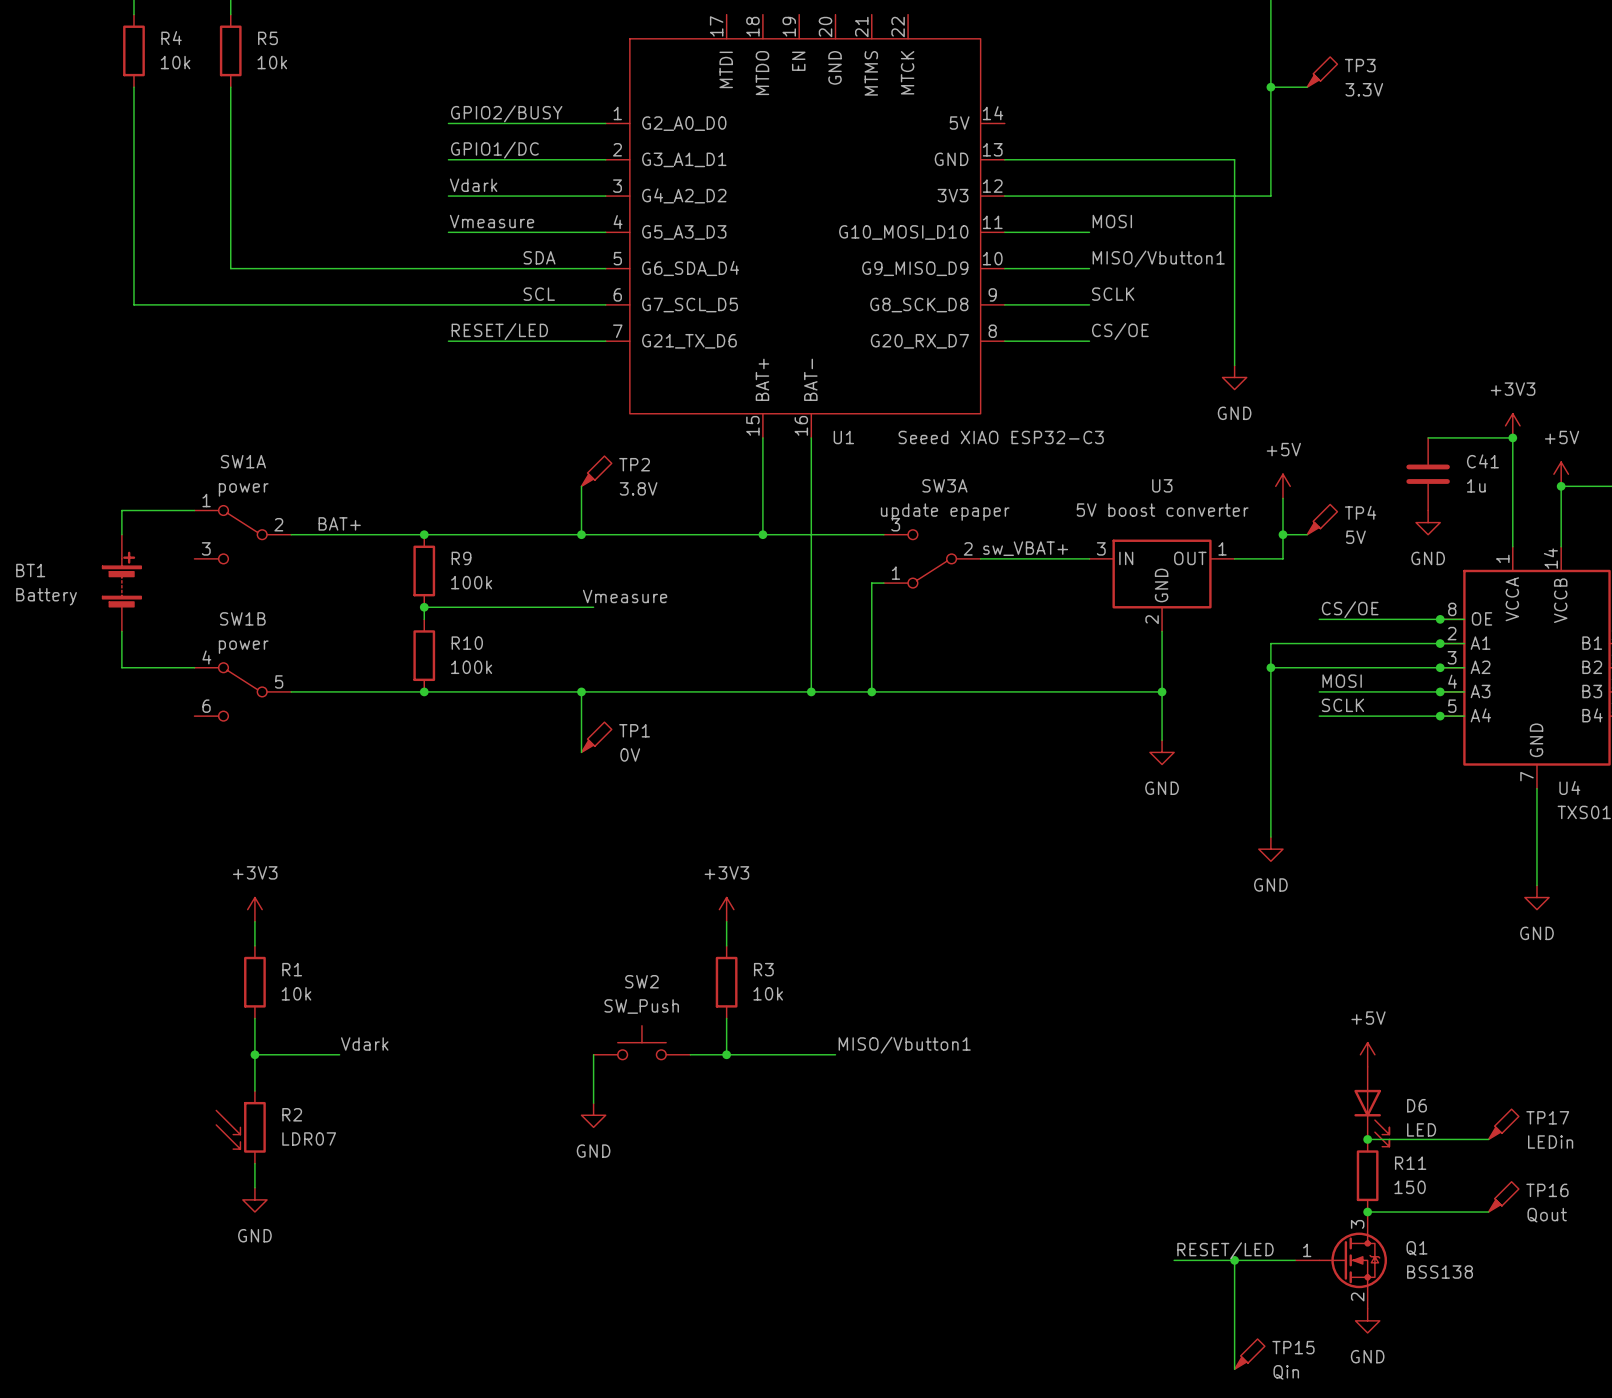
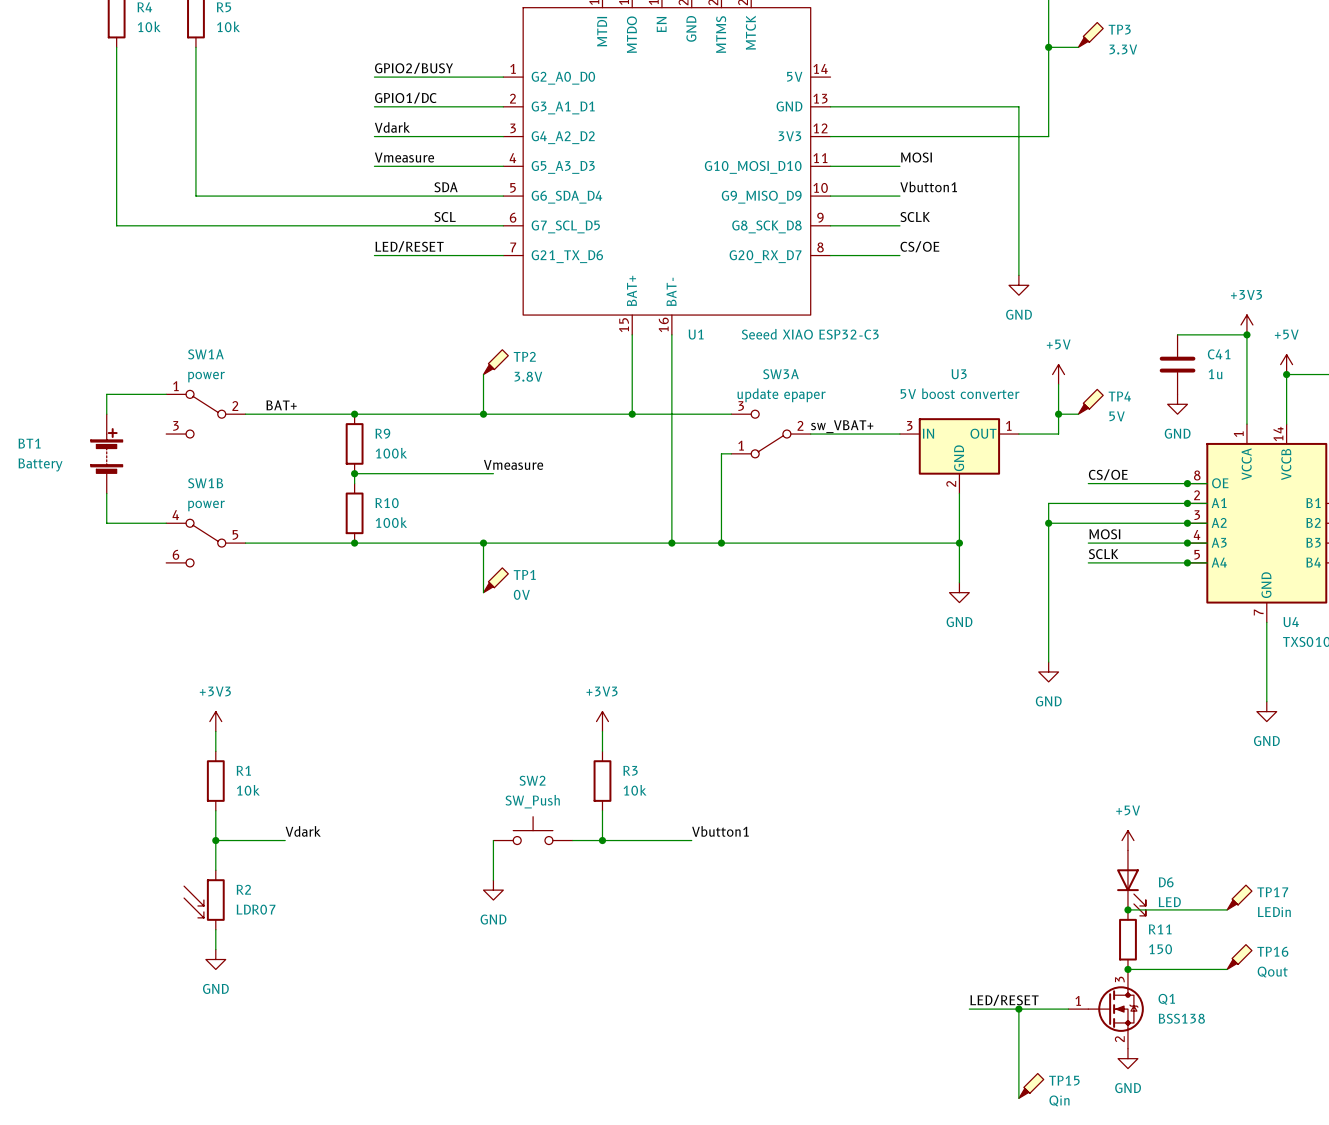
label: MISO/Vbutton1 (1158, 258) -> Vbutton1 (928, 186)
label: RESET/LED (499, 331) -> LED/RESET (409, 246)
label: MISO/Vbutton1 (904, 1045) -> Vbutton1 (720, 831)
label: RESET/LED (1225, 1250) -> LED/RESET (1004, 1000)

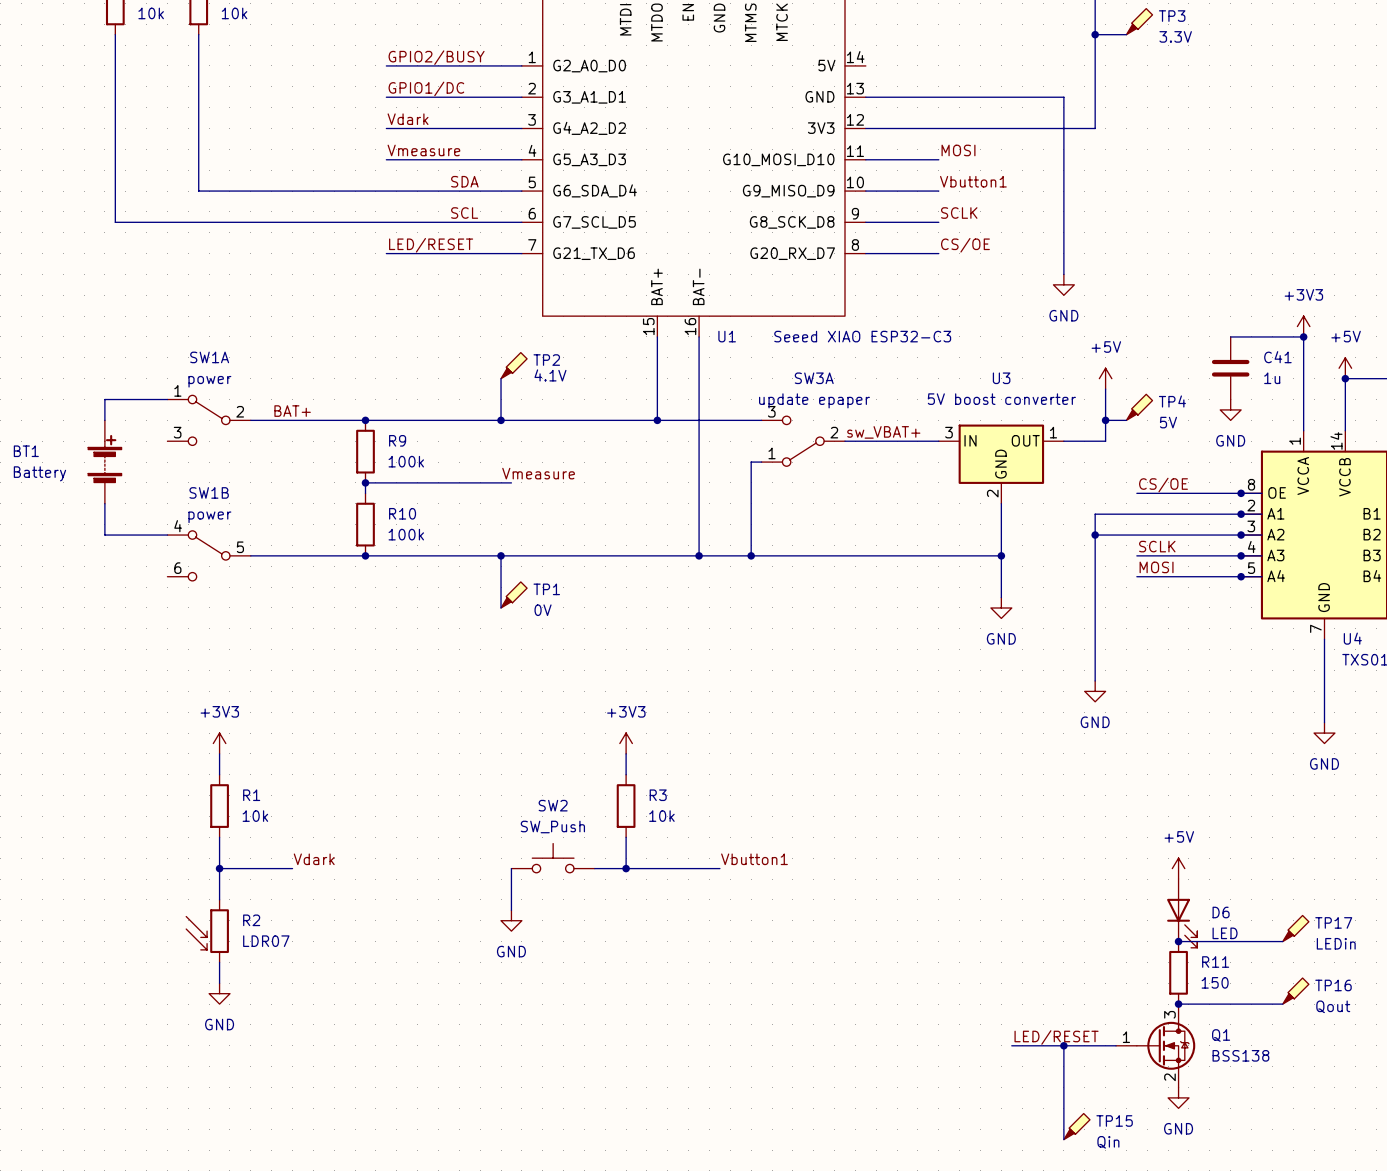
TP2 value: 3.8V (528, 376) -> 4.1V (550, 375)
label: MOSI (1104, 534) -> SCLK (1157, 546)
label: SCLK (1103, 554) -> MOSI (1156, 567)

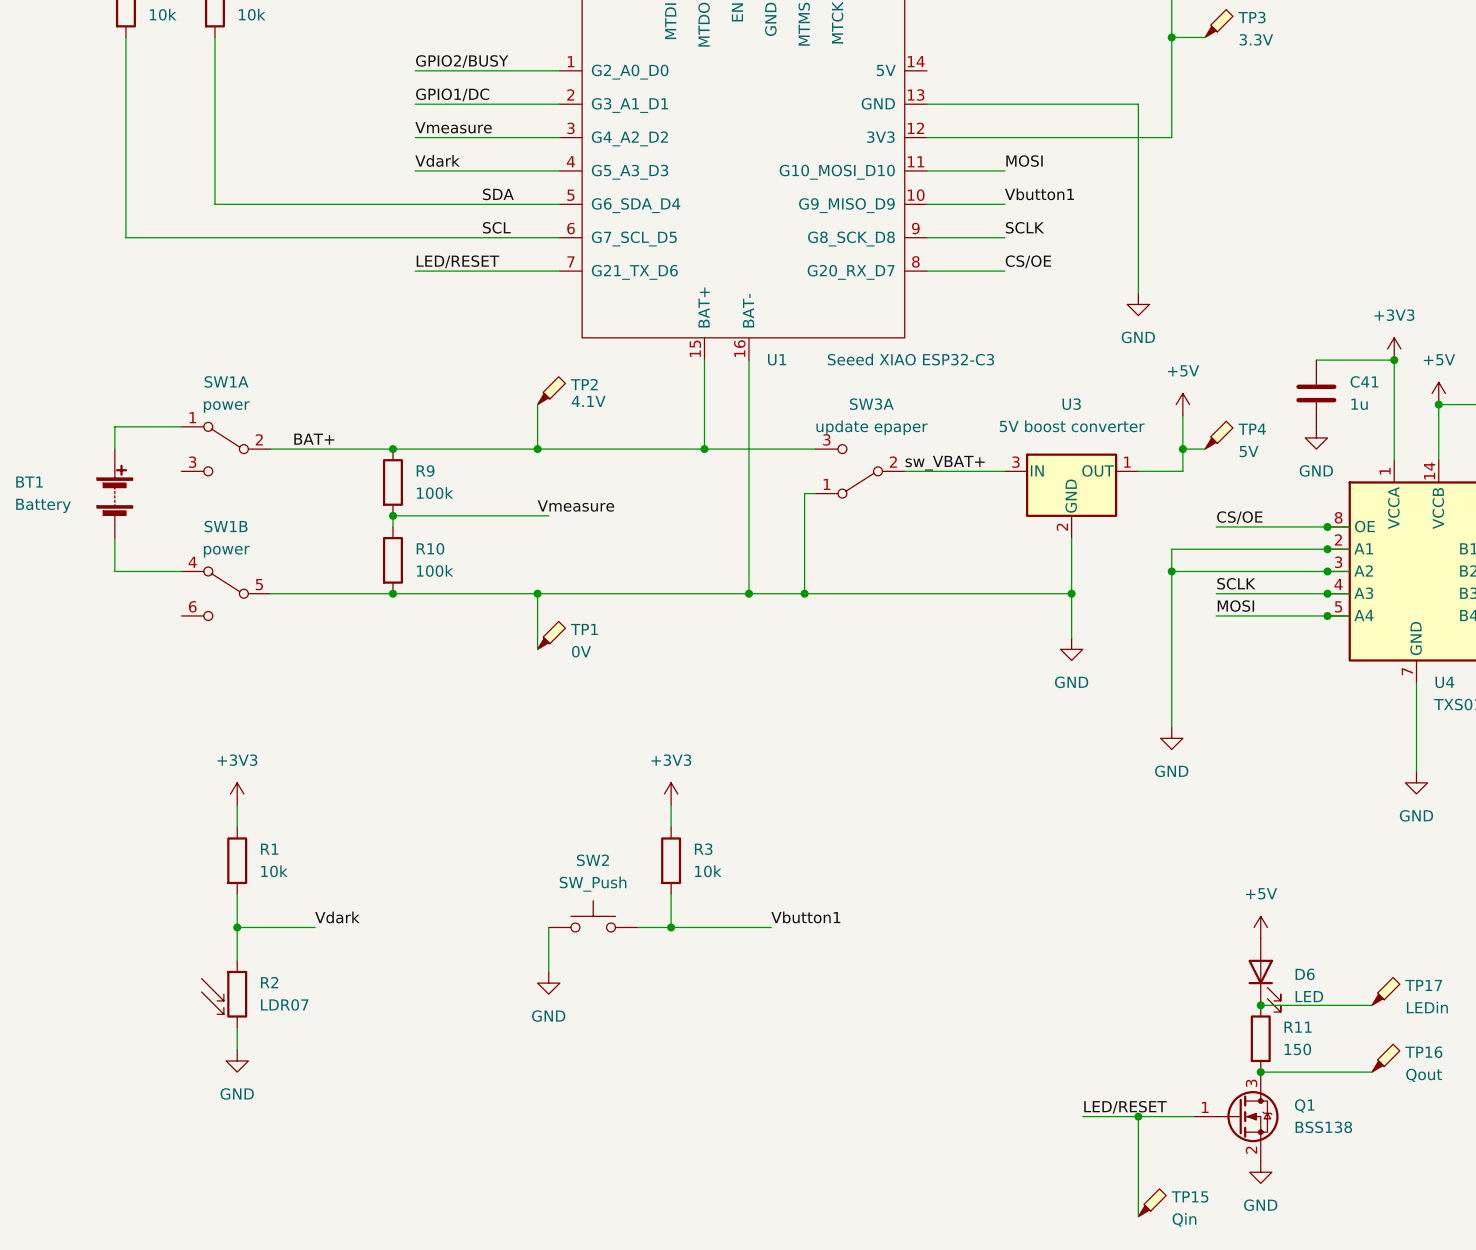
label: Vdark (408, 119) -> Vmeasure (453, 127)
label: Vmeasure (423, 150) -> Vdark (437, 160)

